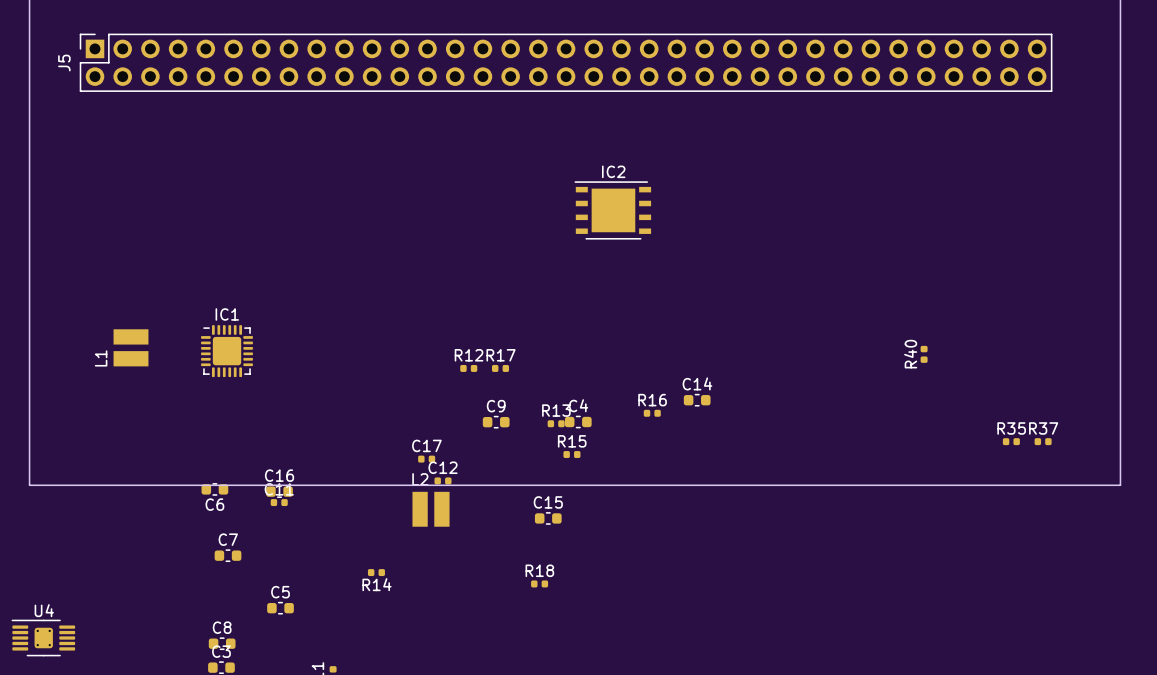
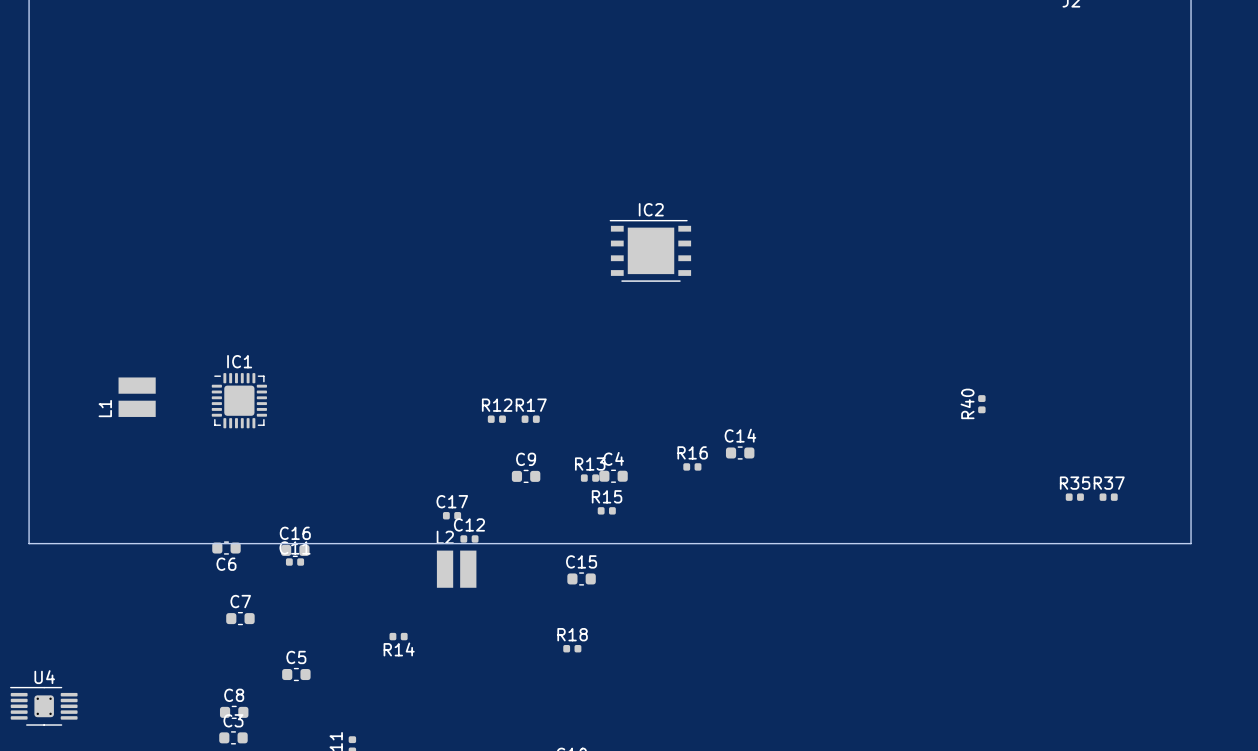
J5: (566, 62) -> none

